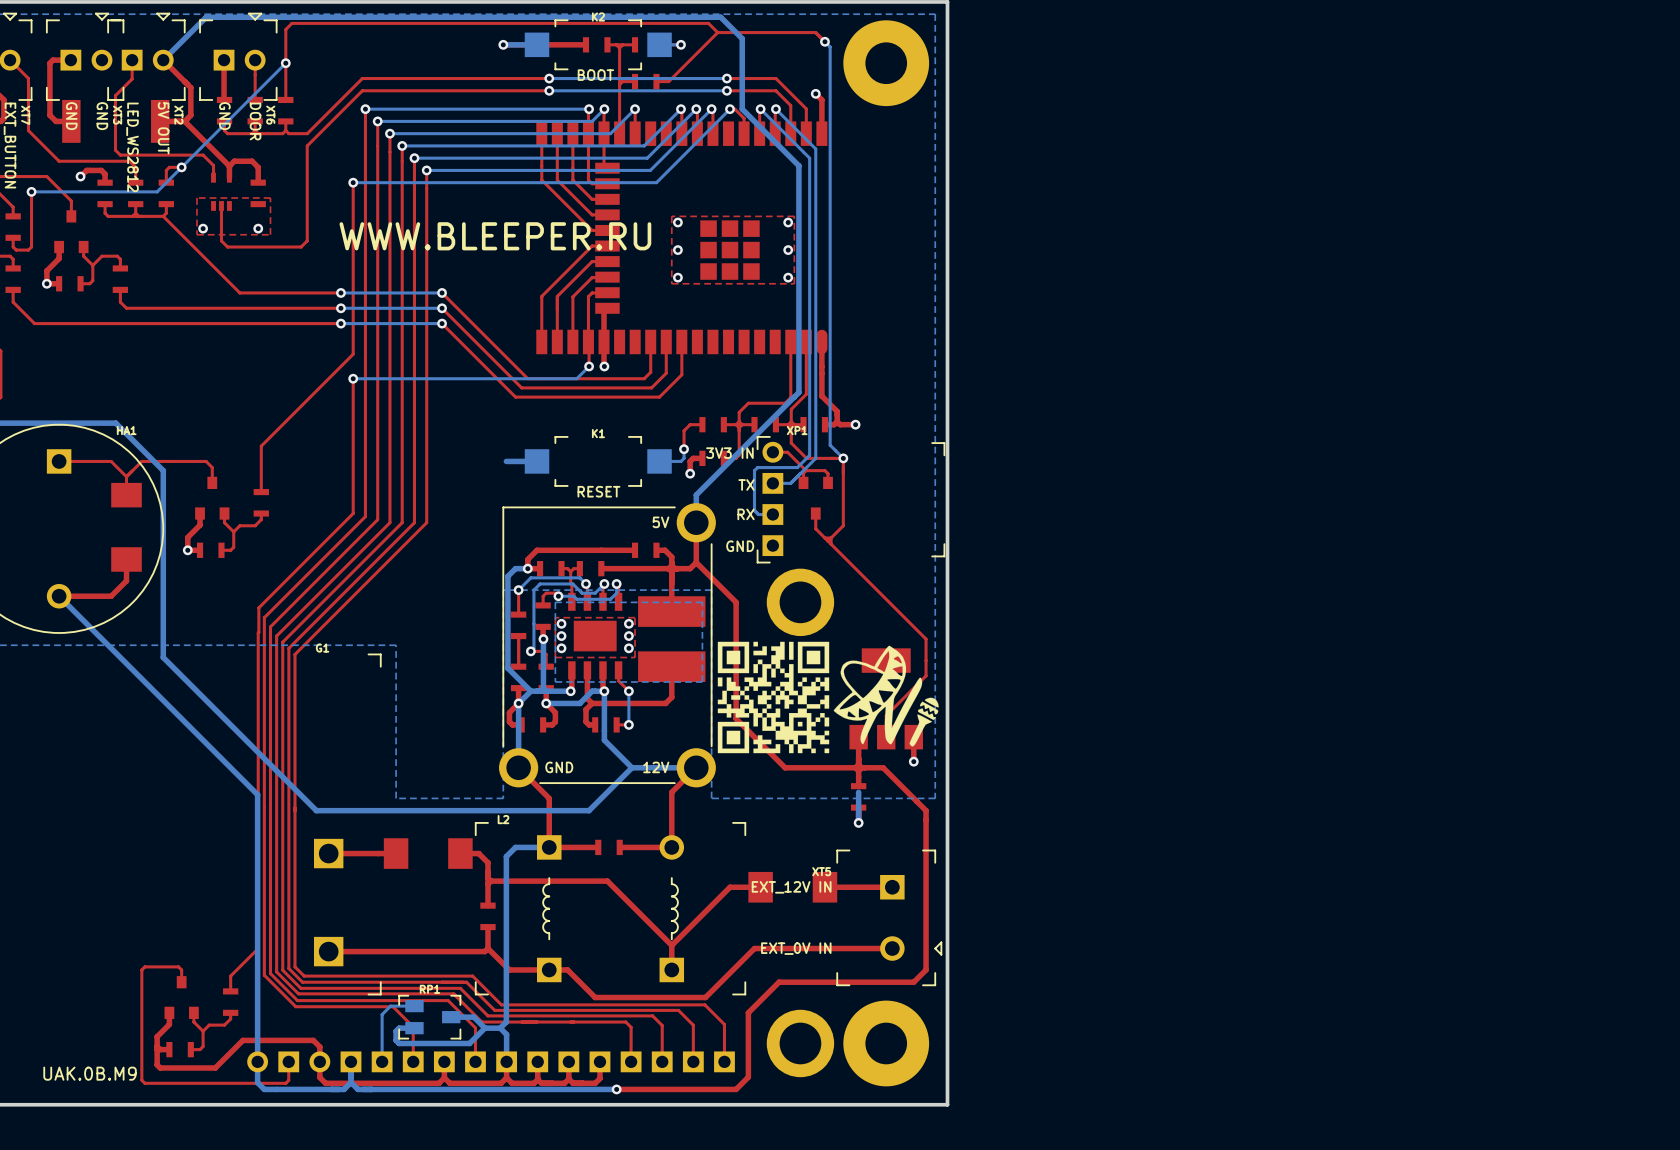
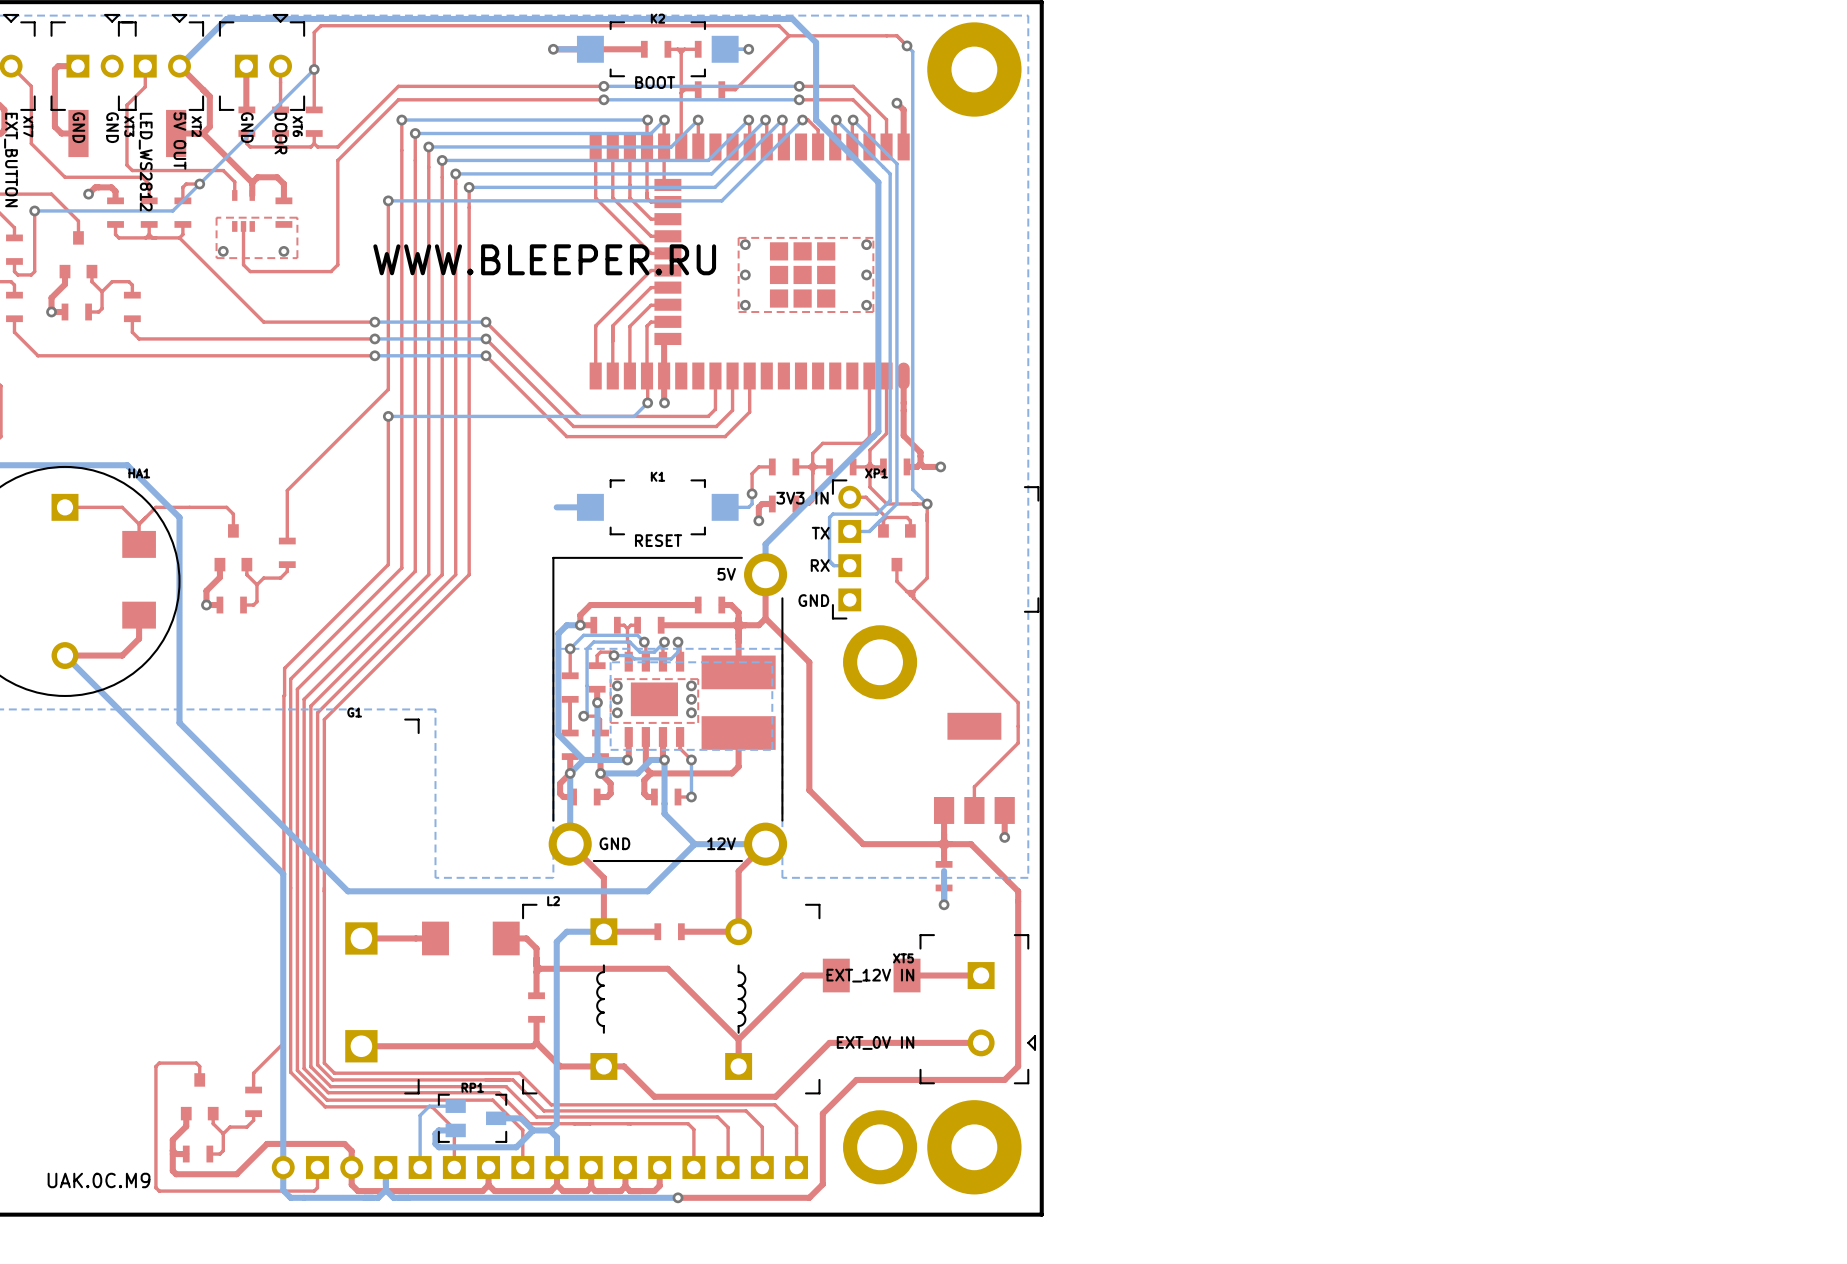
drawing: [717, 641, 939, 754] -> none
text: UAK.0B.M9 (90, 1073) -> UAK.0C.M9 (99, 1180)

